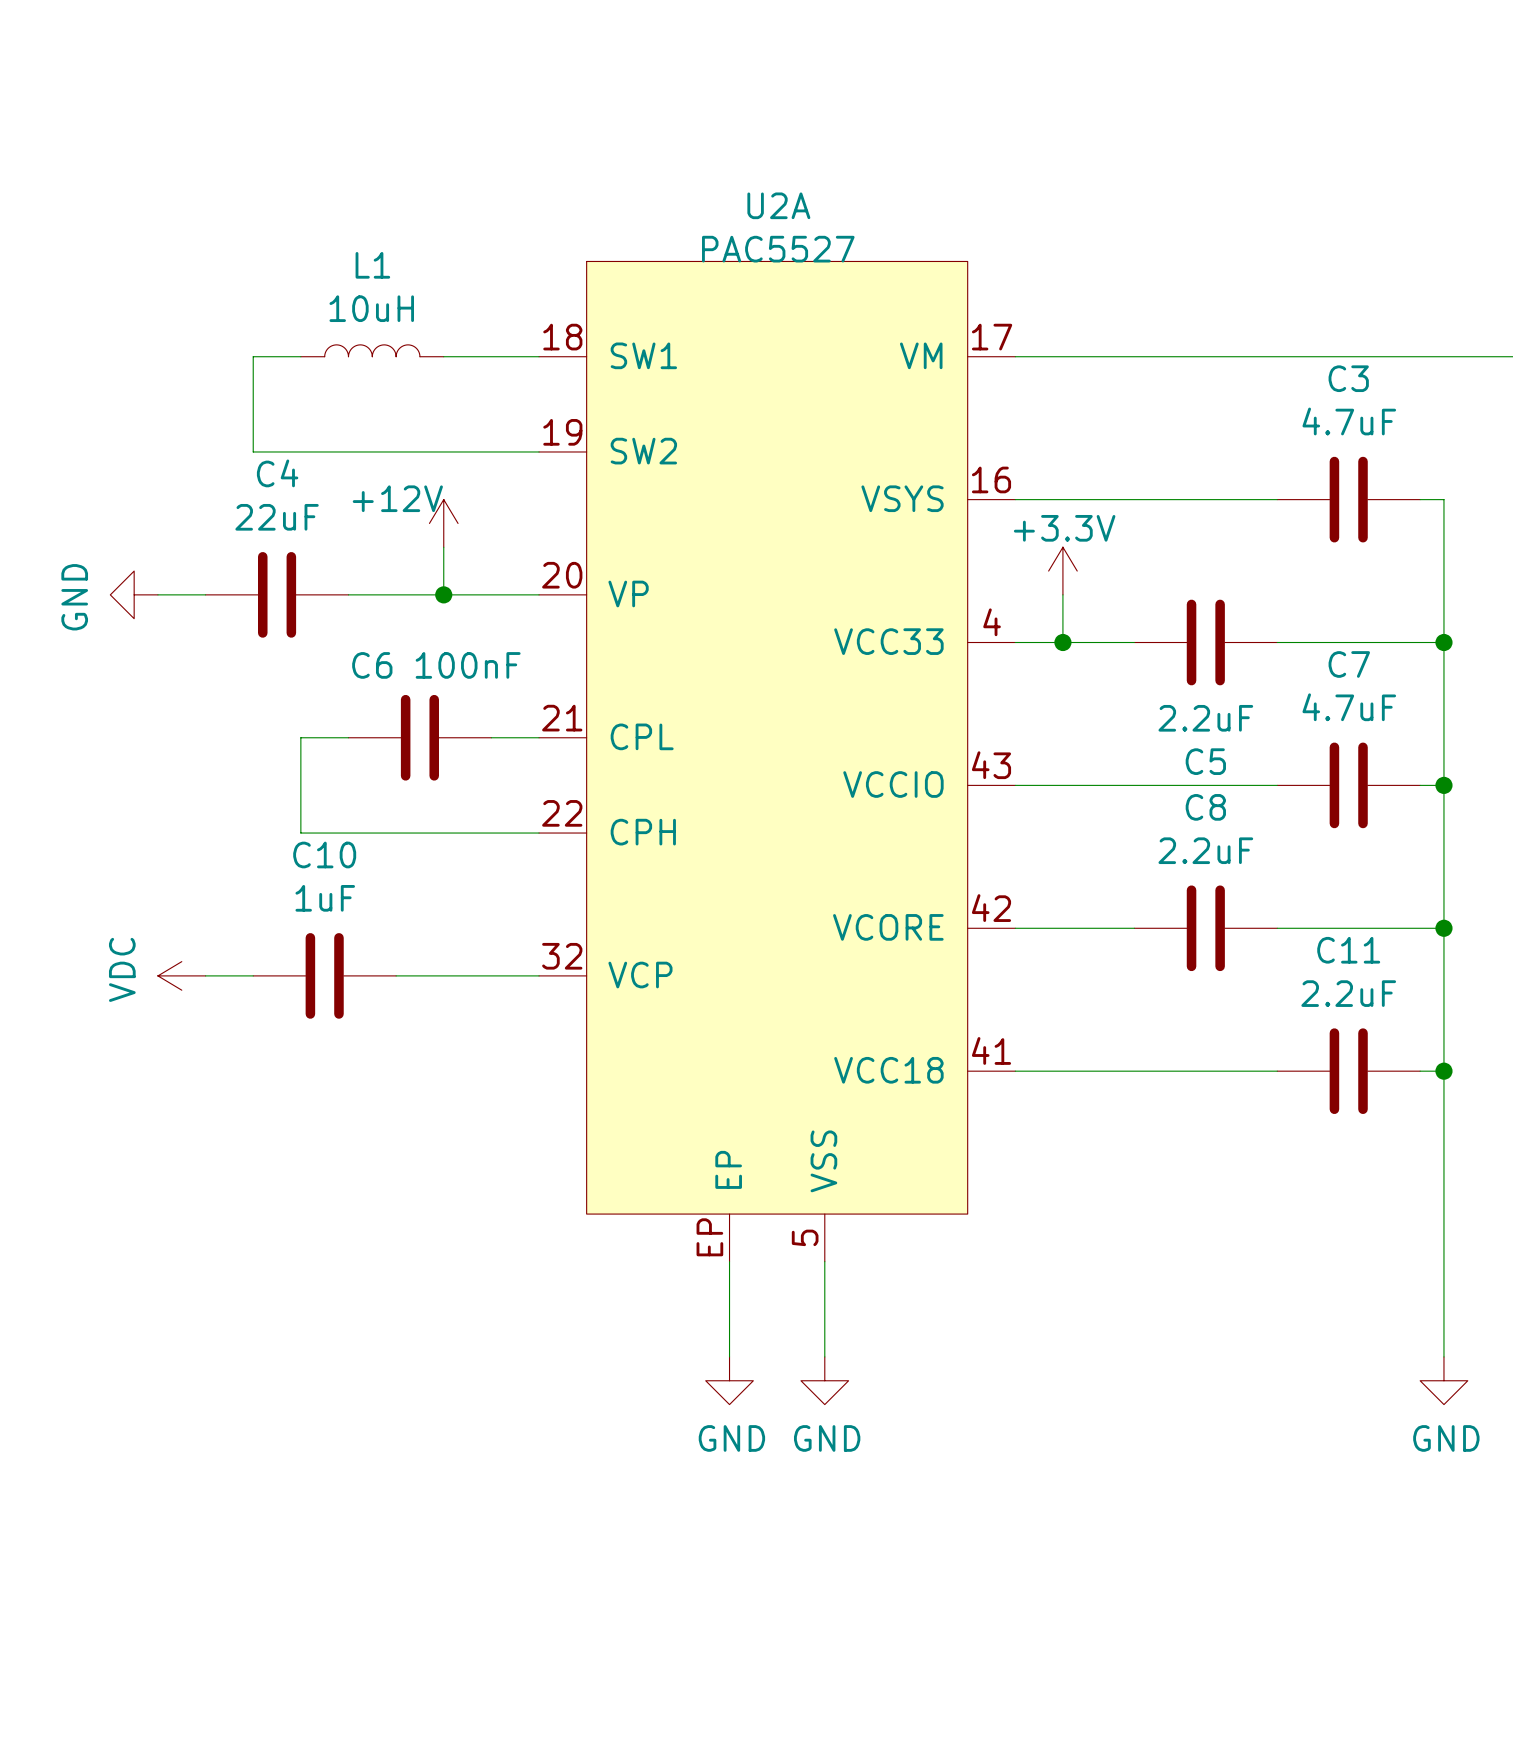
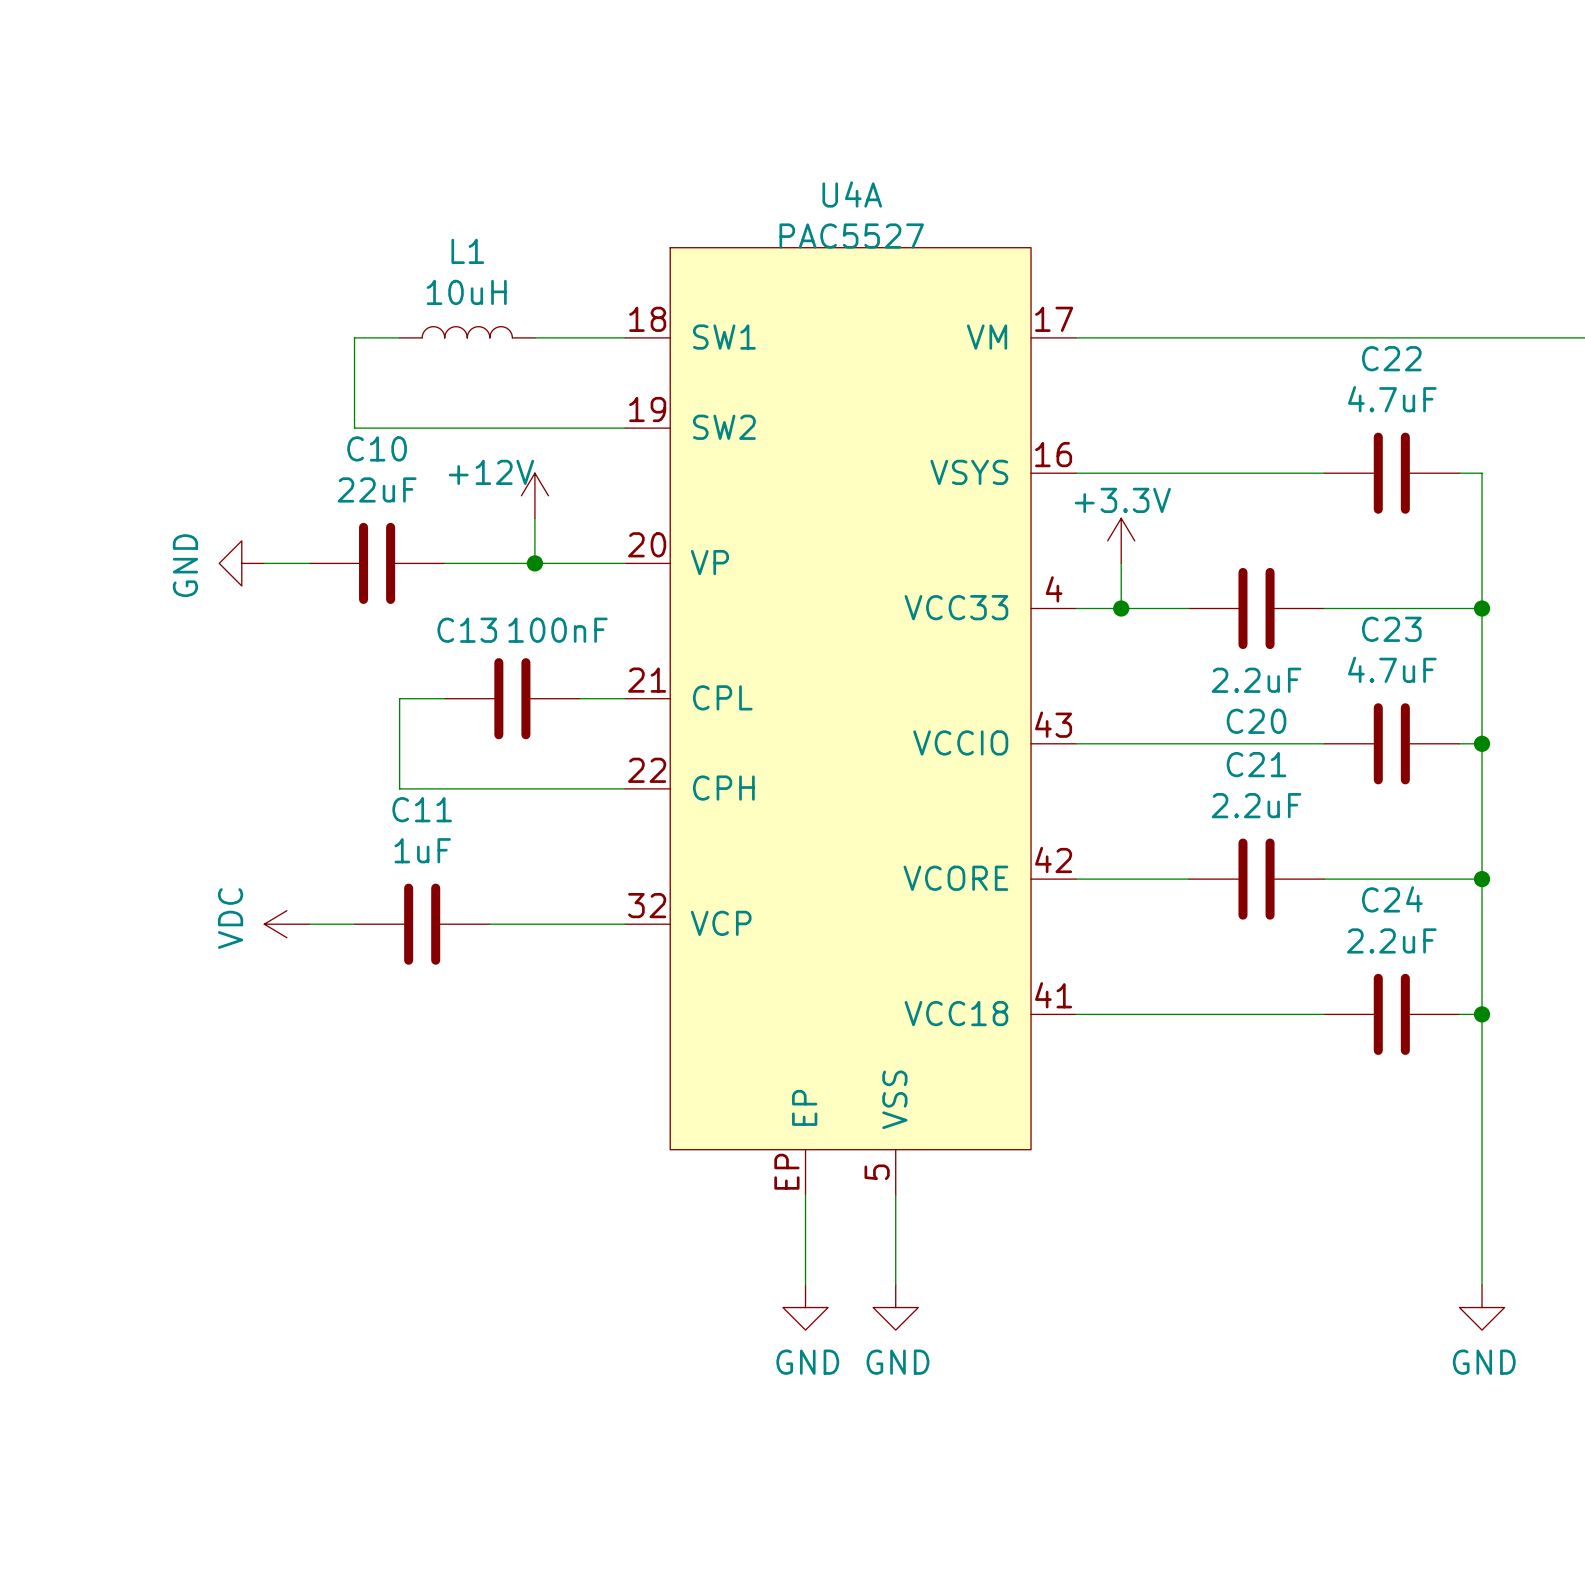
U2A name: U2A (778, 205) -> U4A (852, 194)
C3 name: C3 (1348, 378) -> C22 (1391, 358)
C4 name: C4 (277, 473) -> C10 (377, 448)
C7 name: C7 (1349, 664) -> C23 (1391, 629)
C6 name: C6 (372, 665) -> C13 (467, 630)
C5 name: C5 (1205, 761) -> C20 (1256, 721)
C8 name: C8 (1205, 807) -> C21 (1256, 764)
C10 name: C10 (324, 854) -> C11 (422, 809)
C11 name: C11 (1348, 950) -> C24 (1392, 899)

